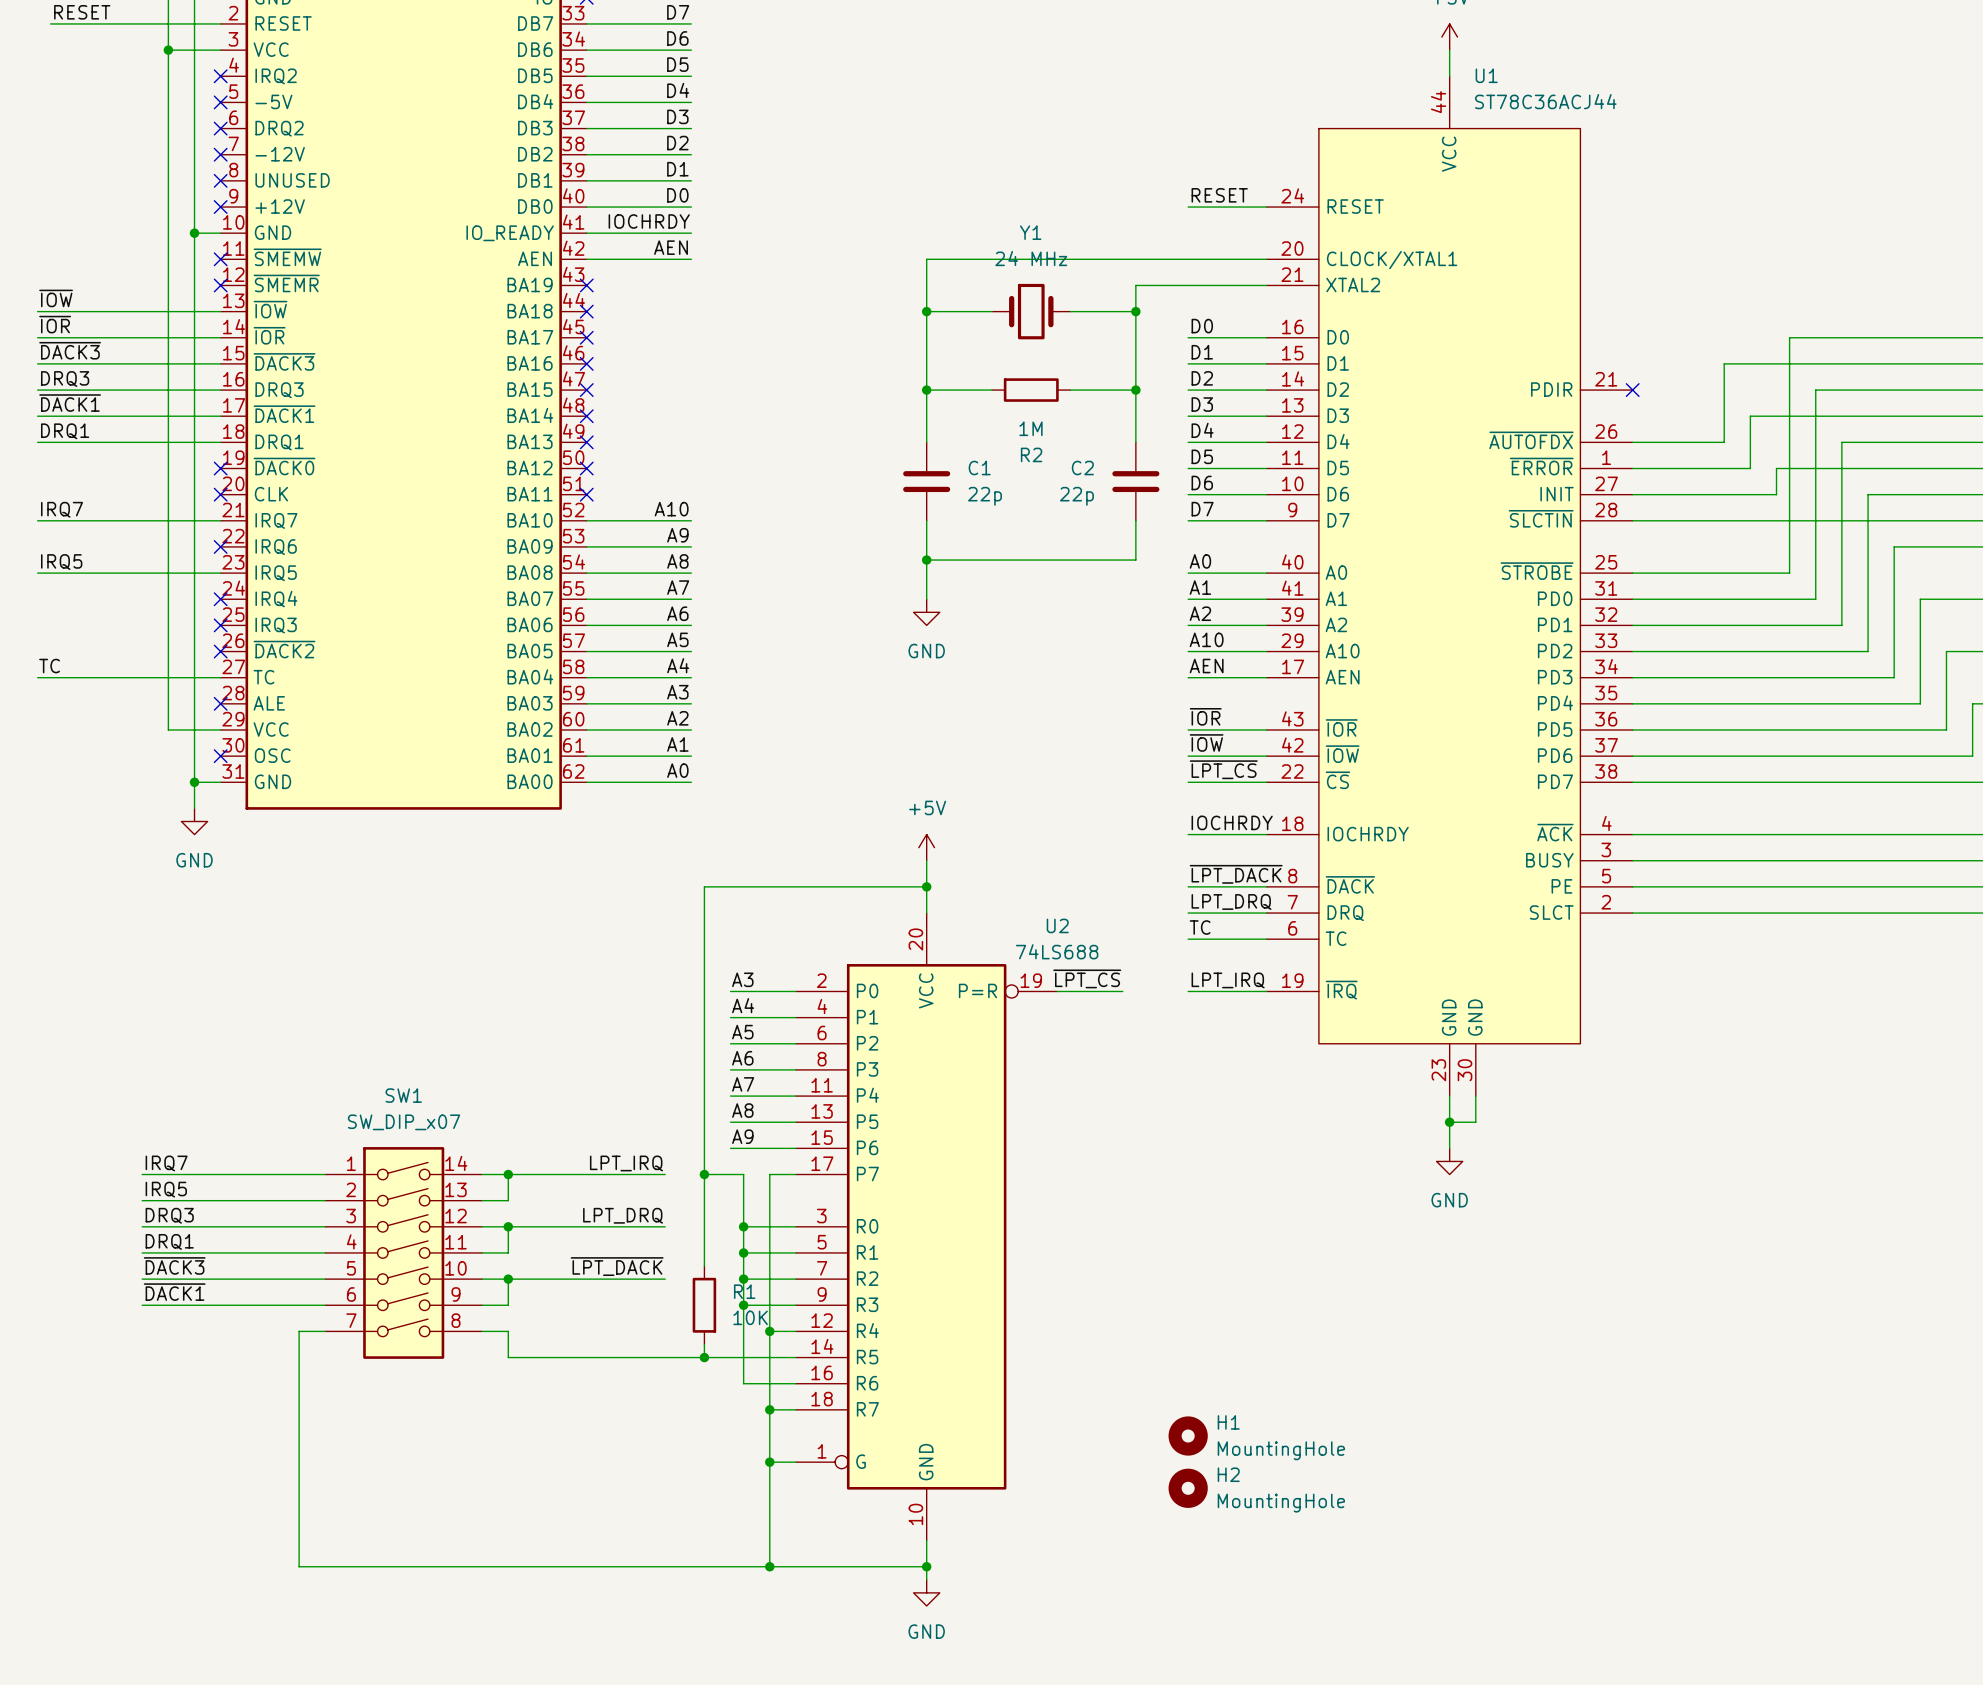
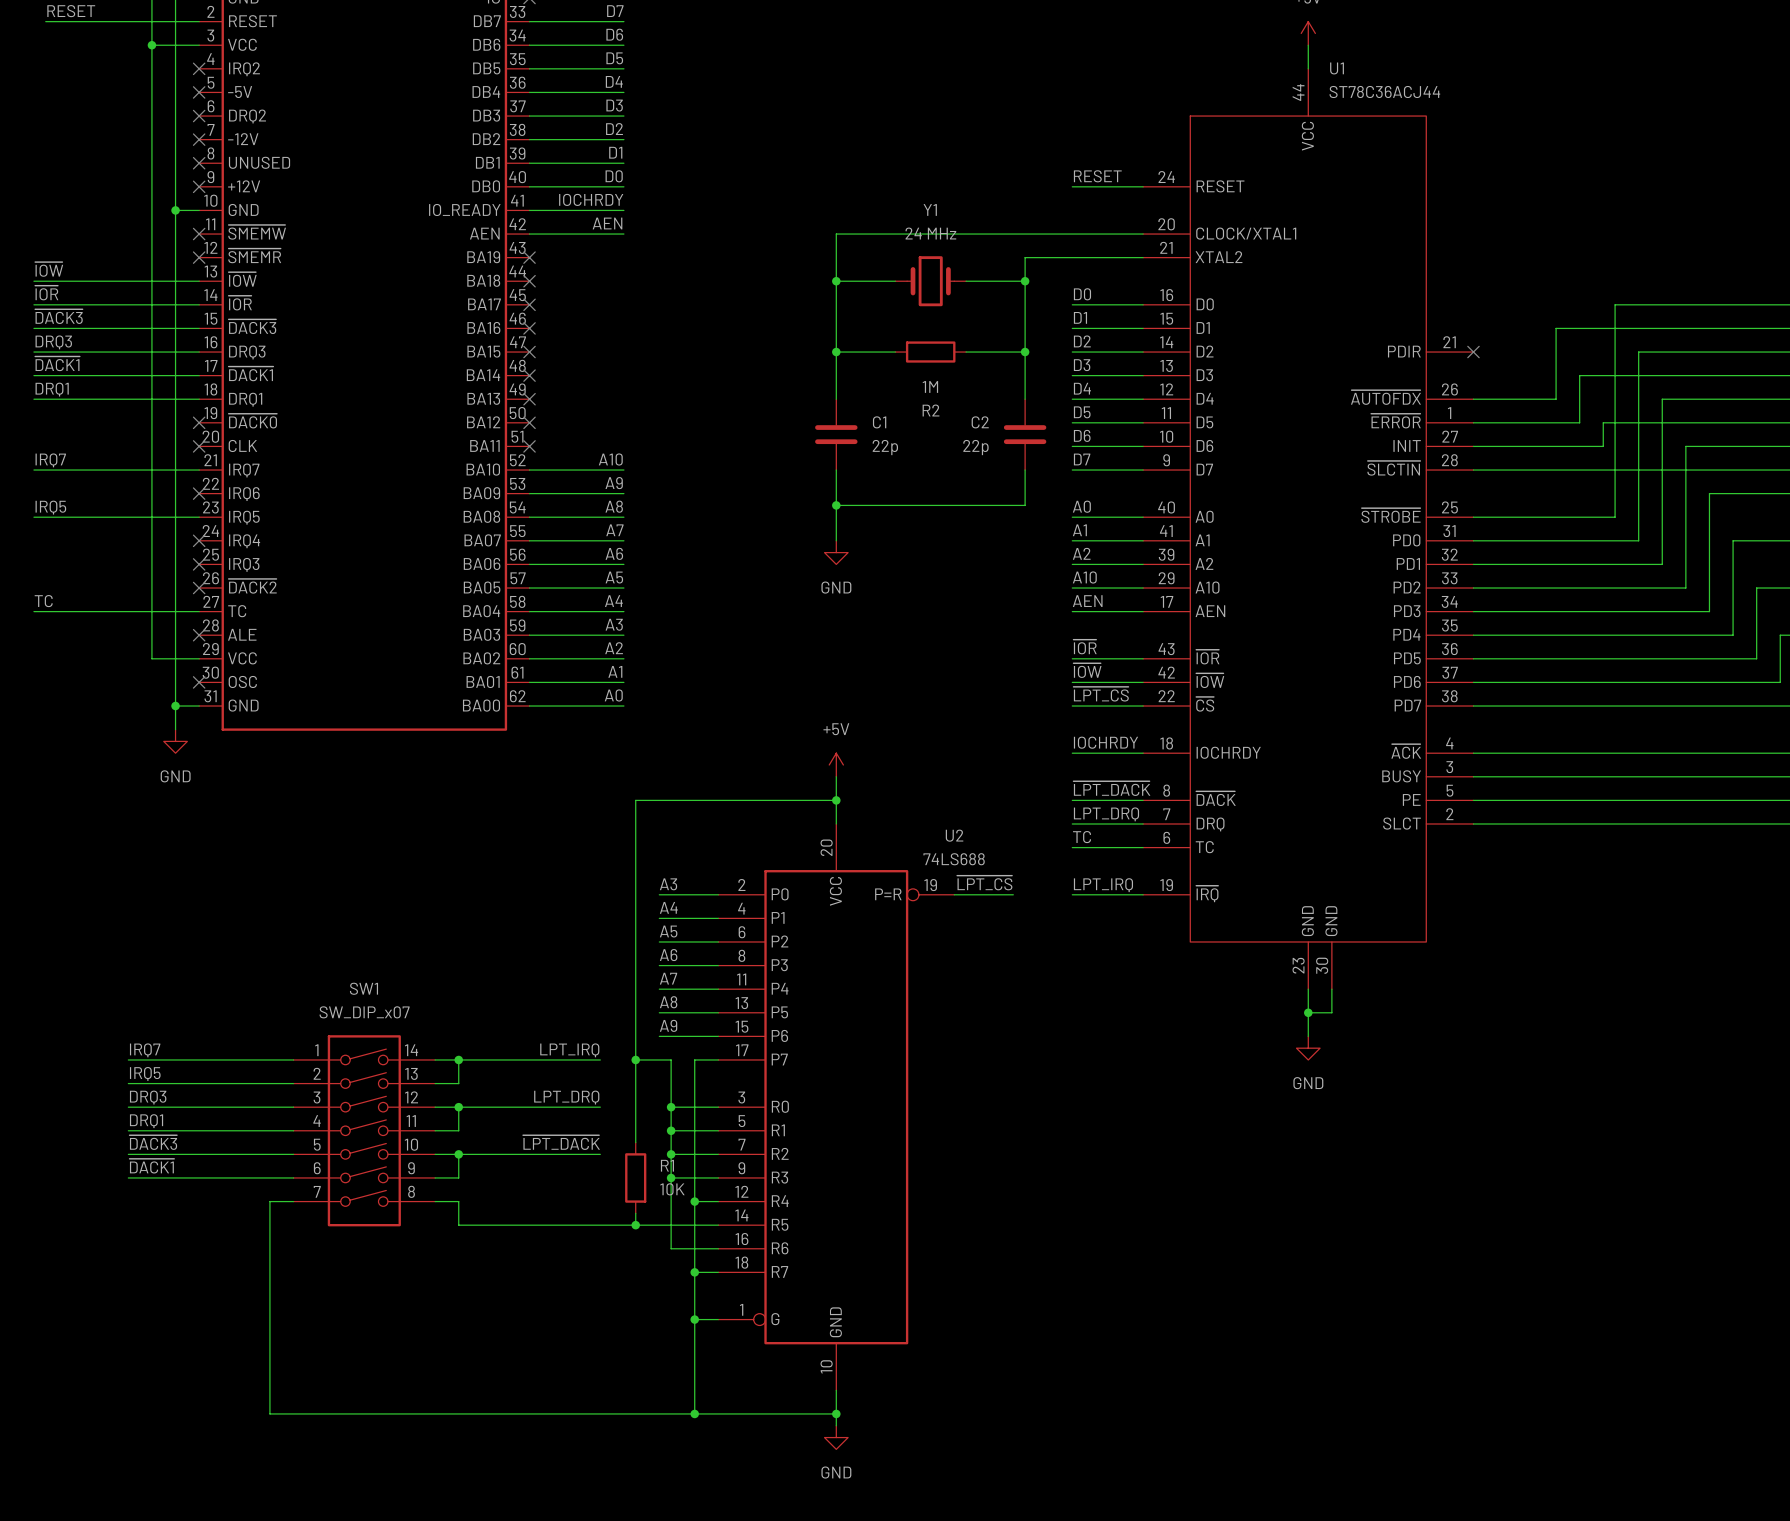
H1: MountingHole (1188, 1436) -> none
H2: MountingHole (1188, 1488) -> none

